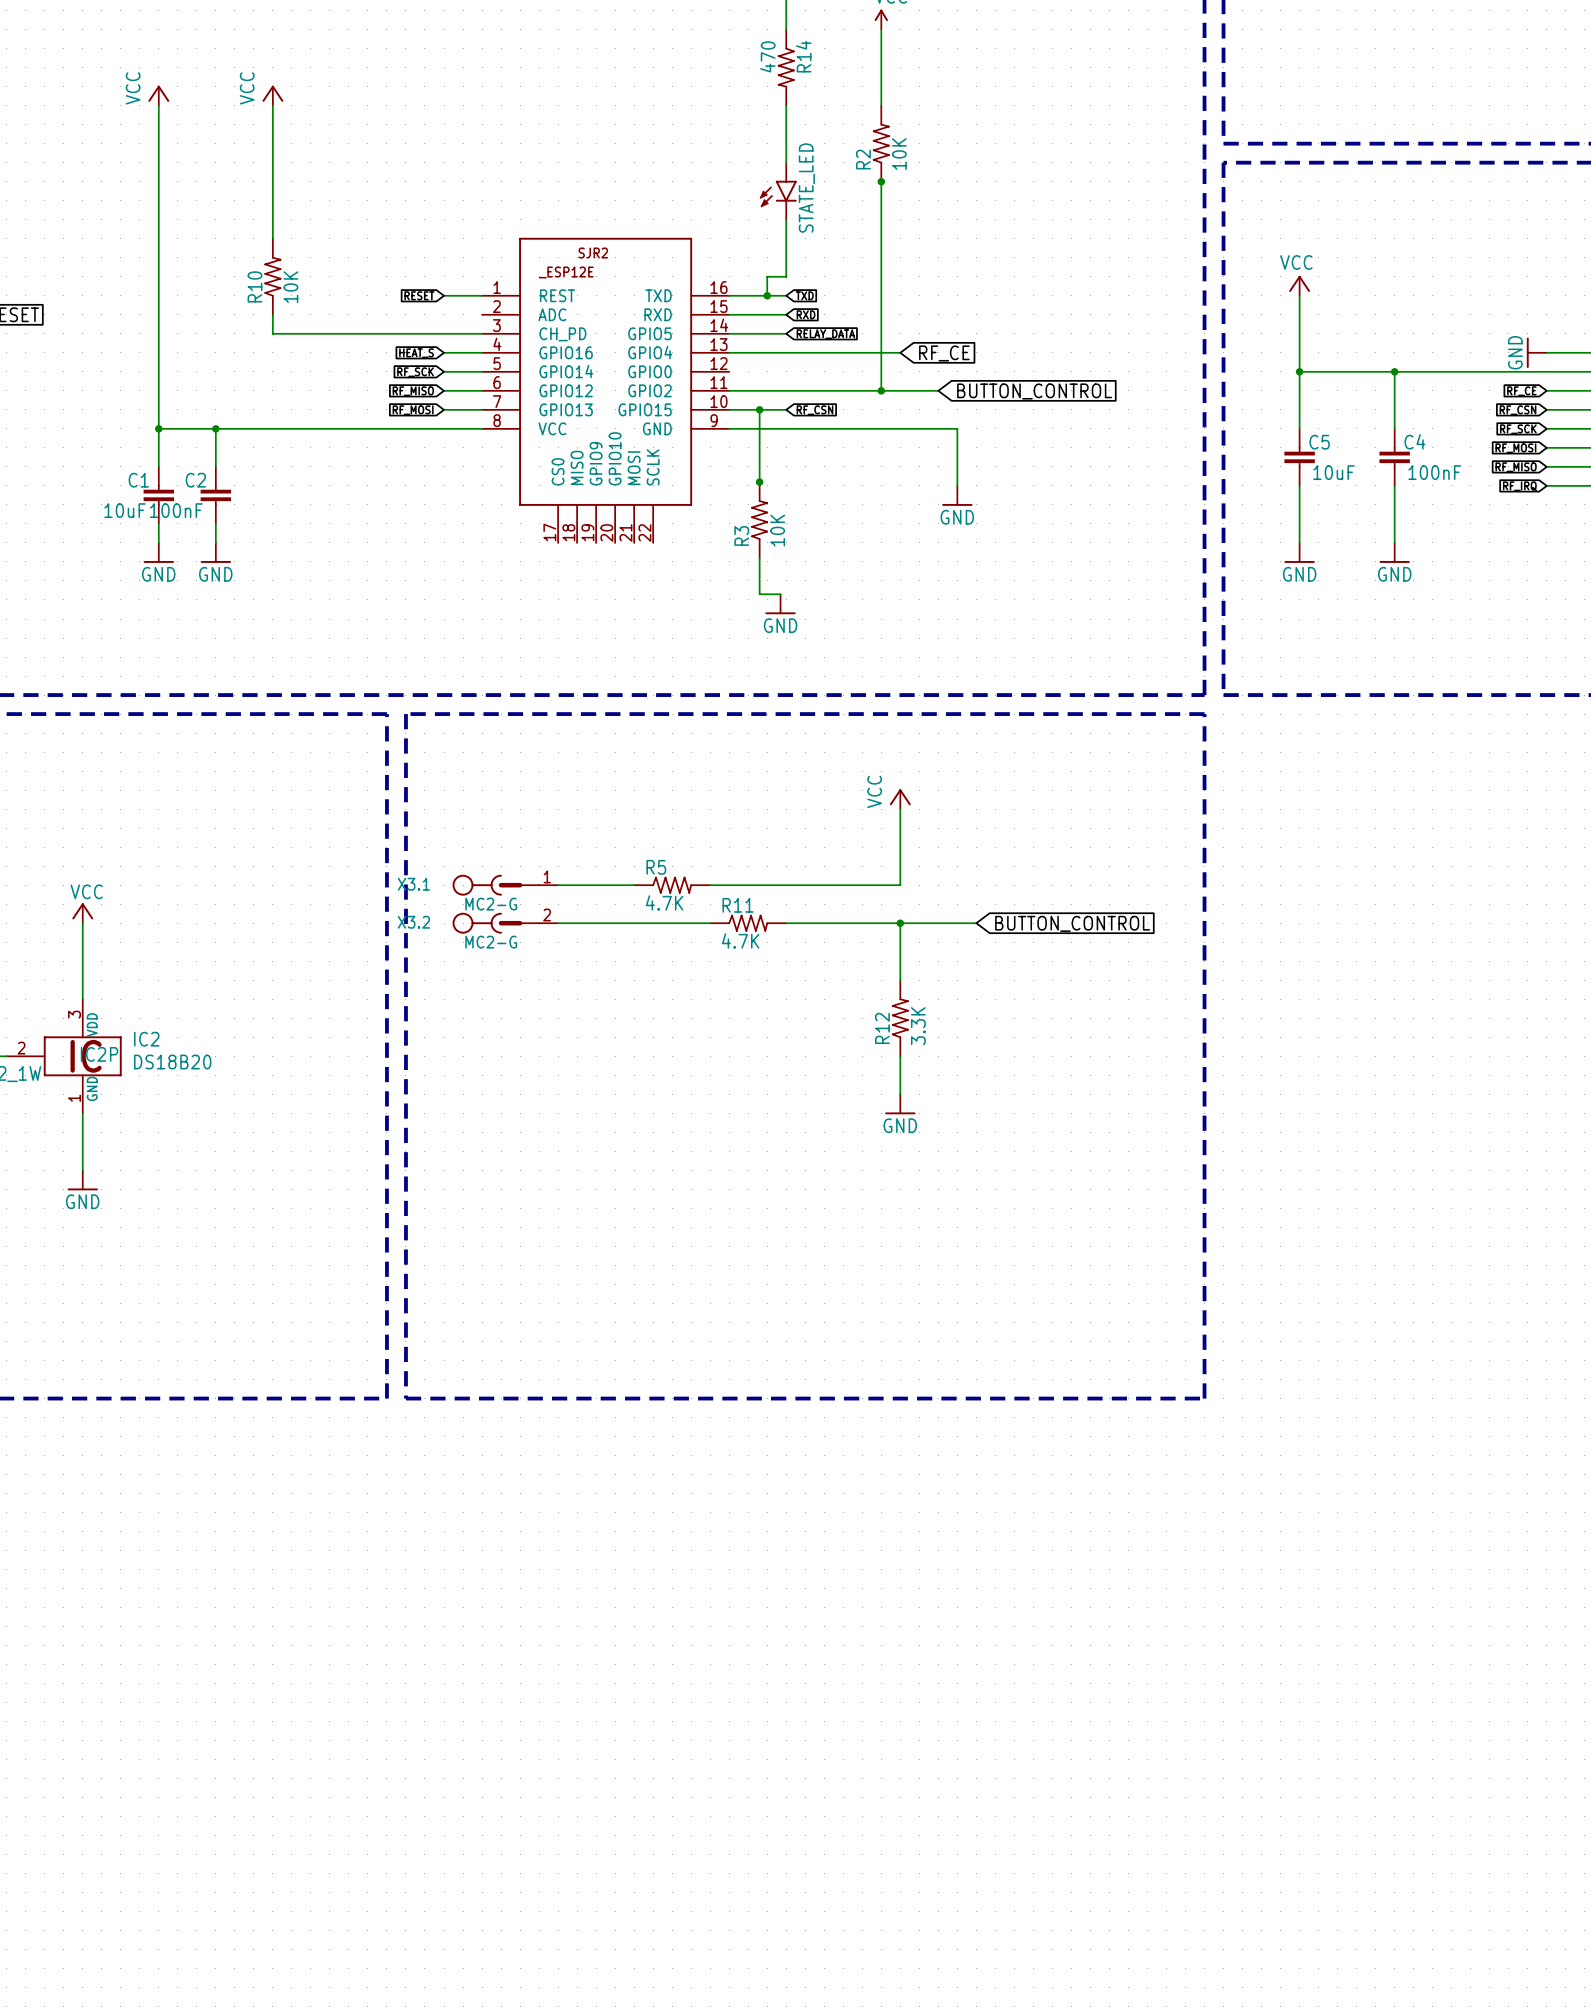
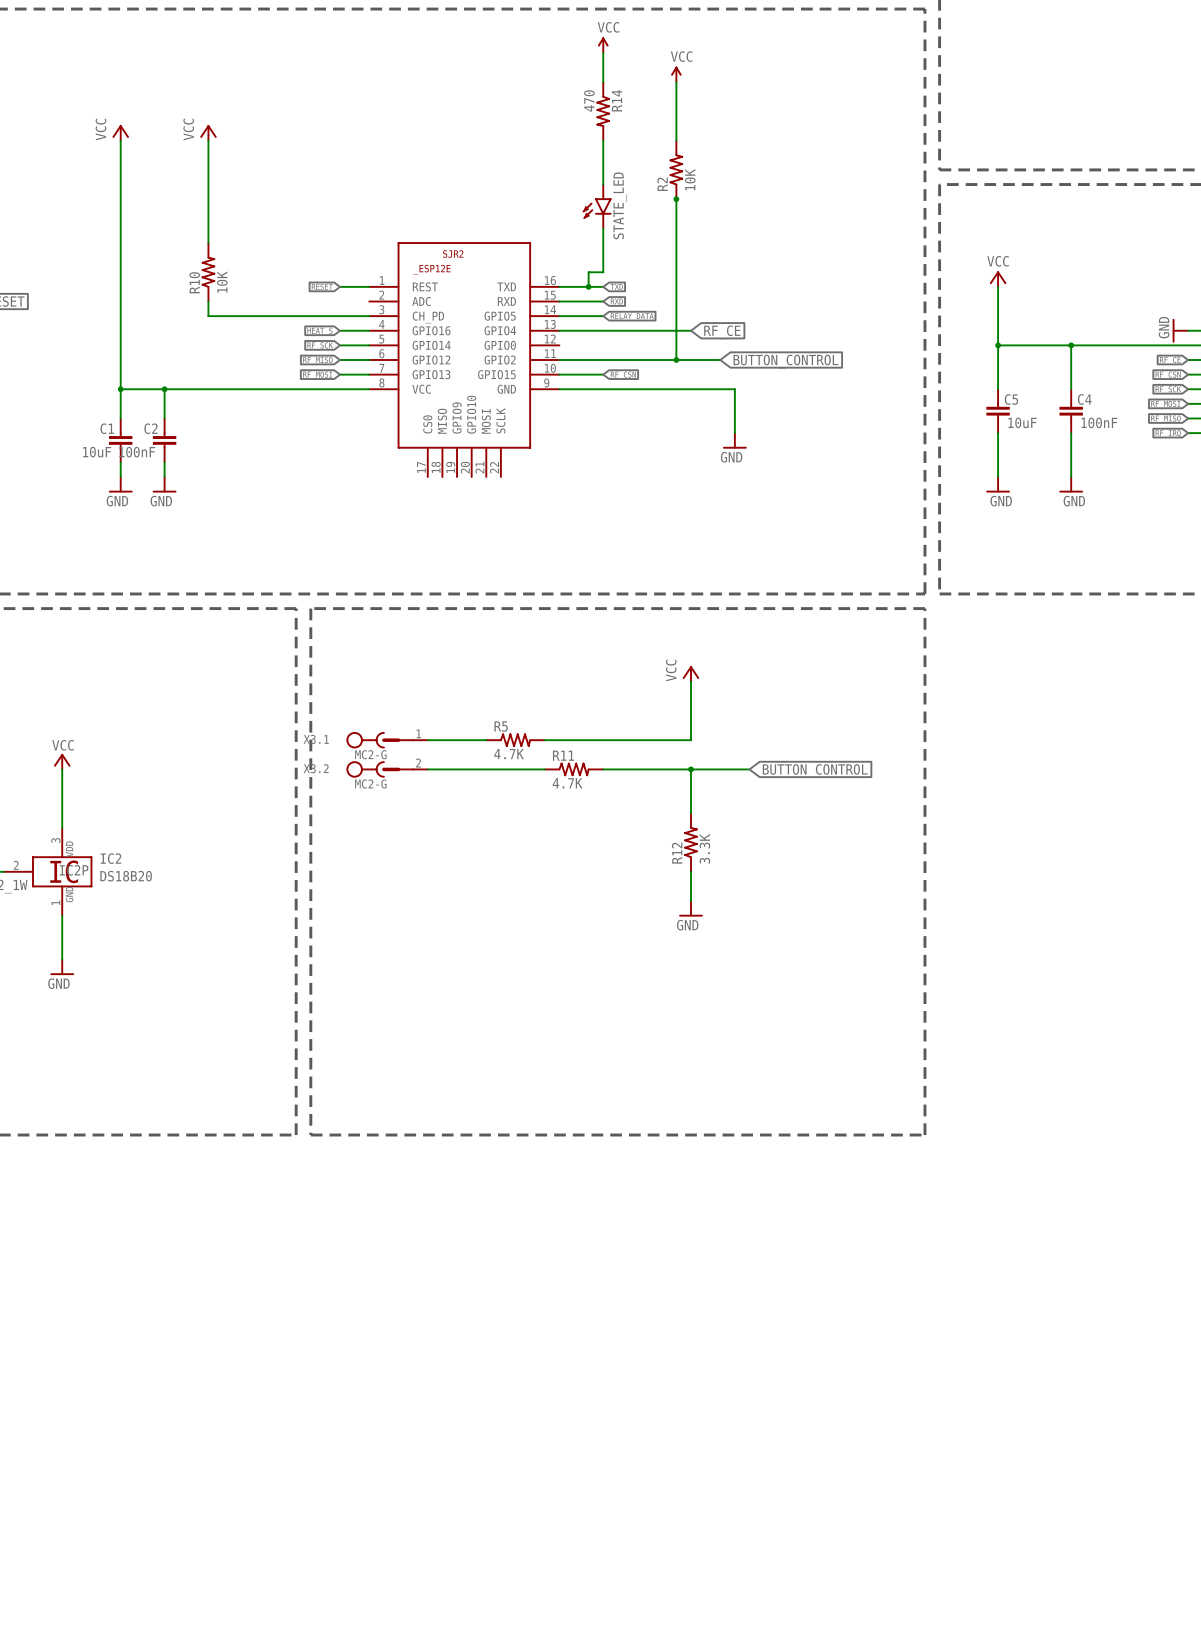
wire: (759, 409) (759, 485) -> none
junction: (759, 409) -> none
junction: (759, 482) -> none
R3: 10K (759, 520) -> none
wire: (759, 558) (759, 594) (780, 594) -> none
power symbol: GND (780, 604) -> none

